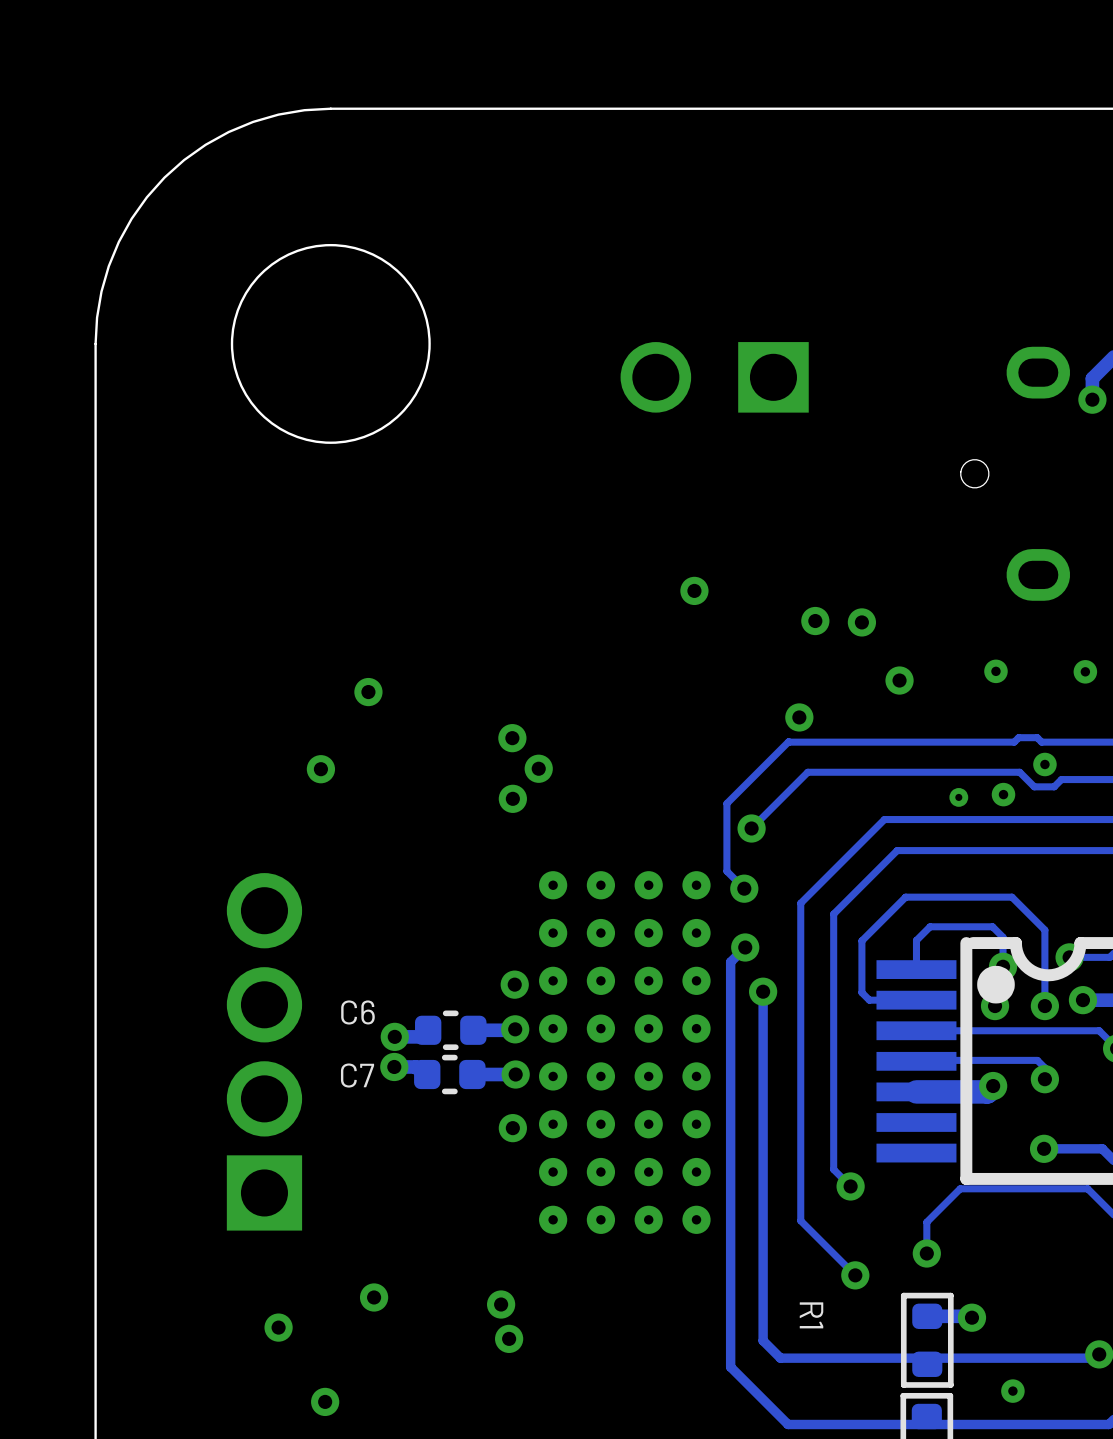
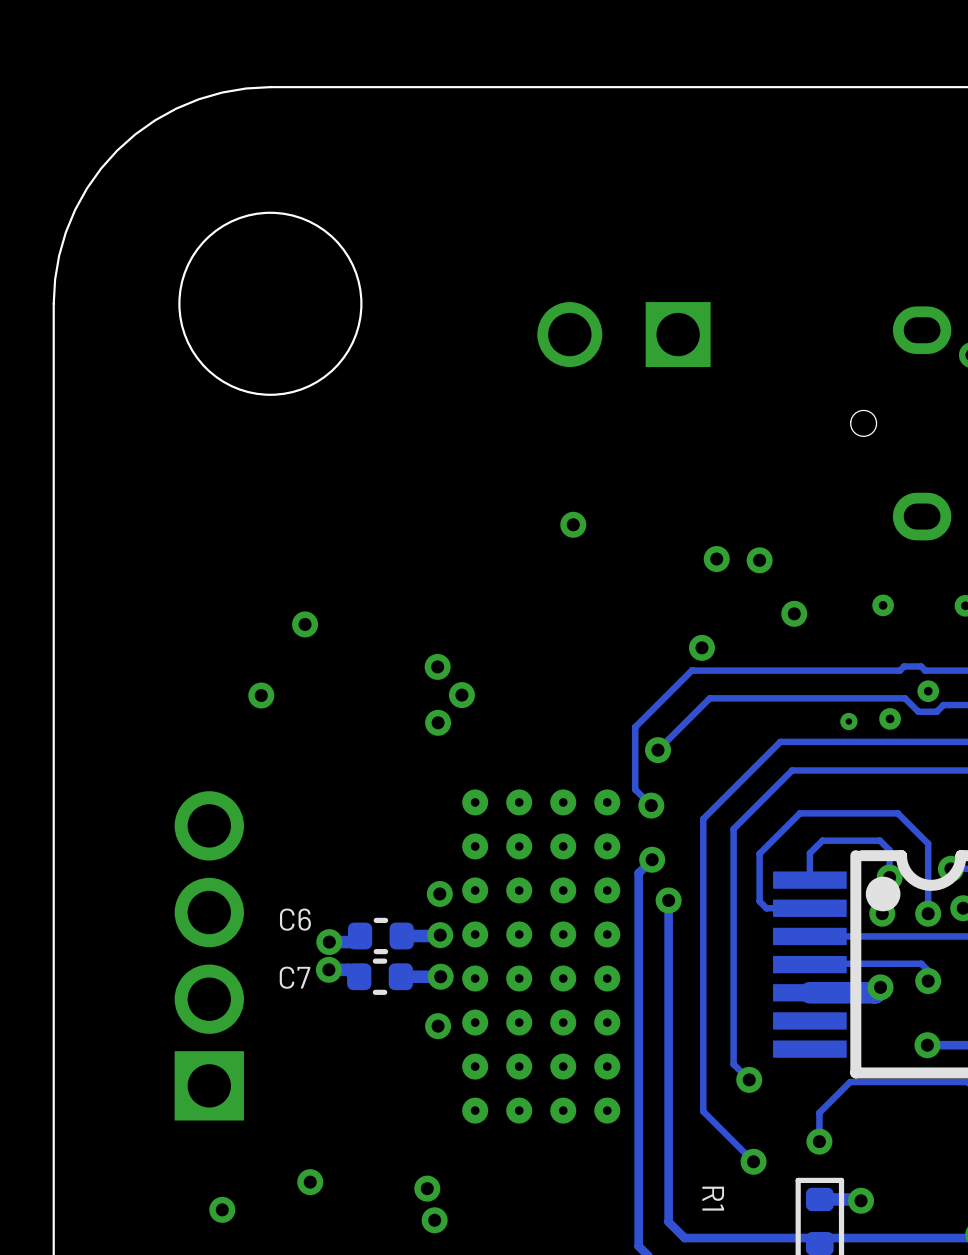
via position: (694, 590) -> (573, 524)

